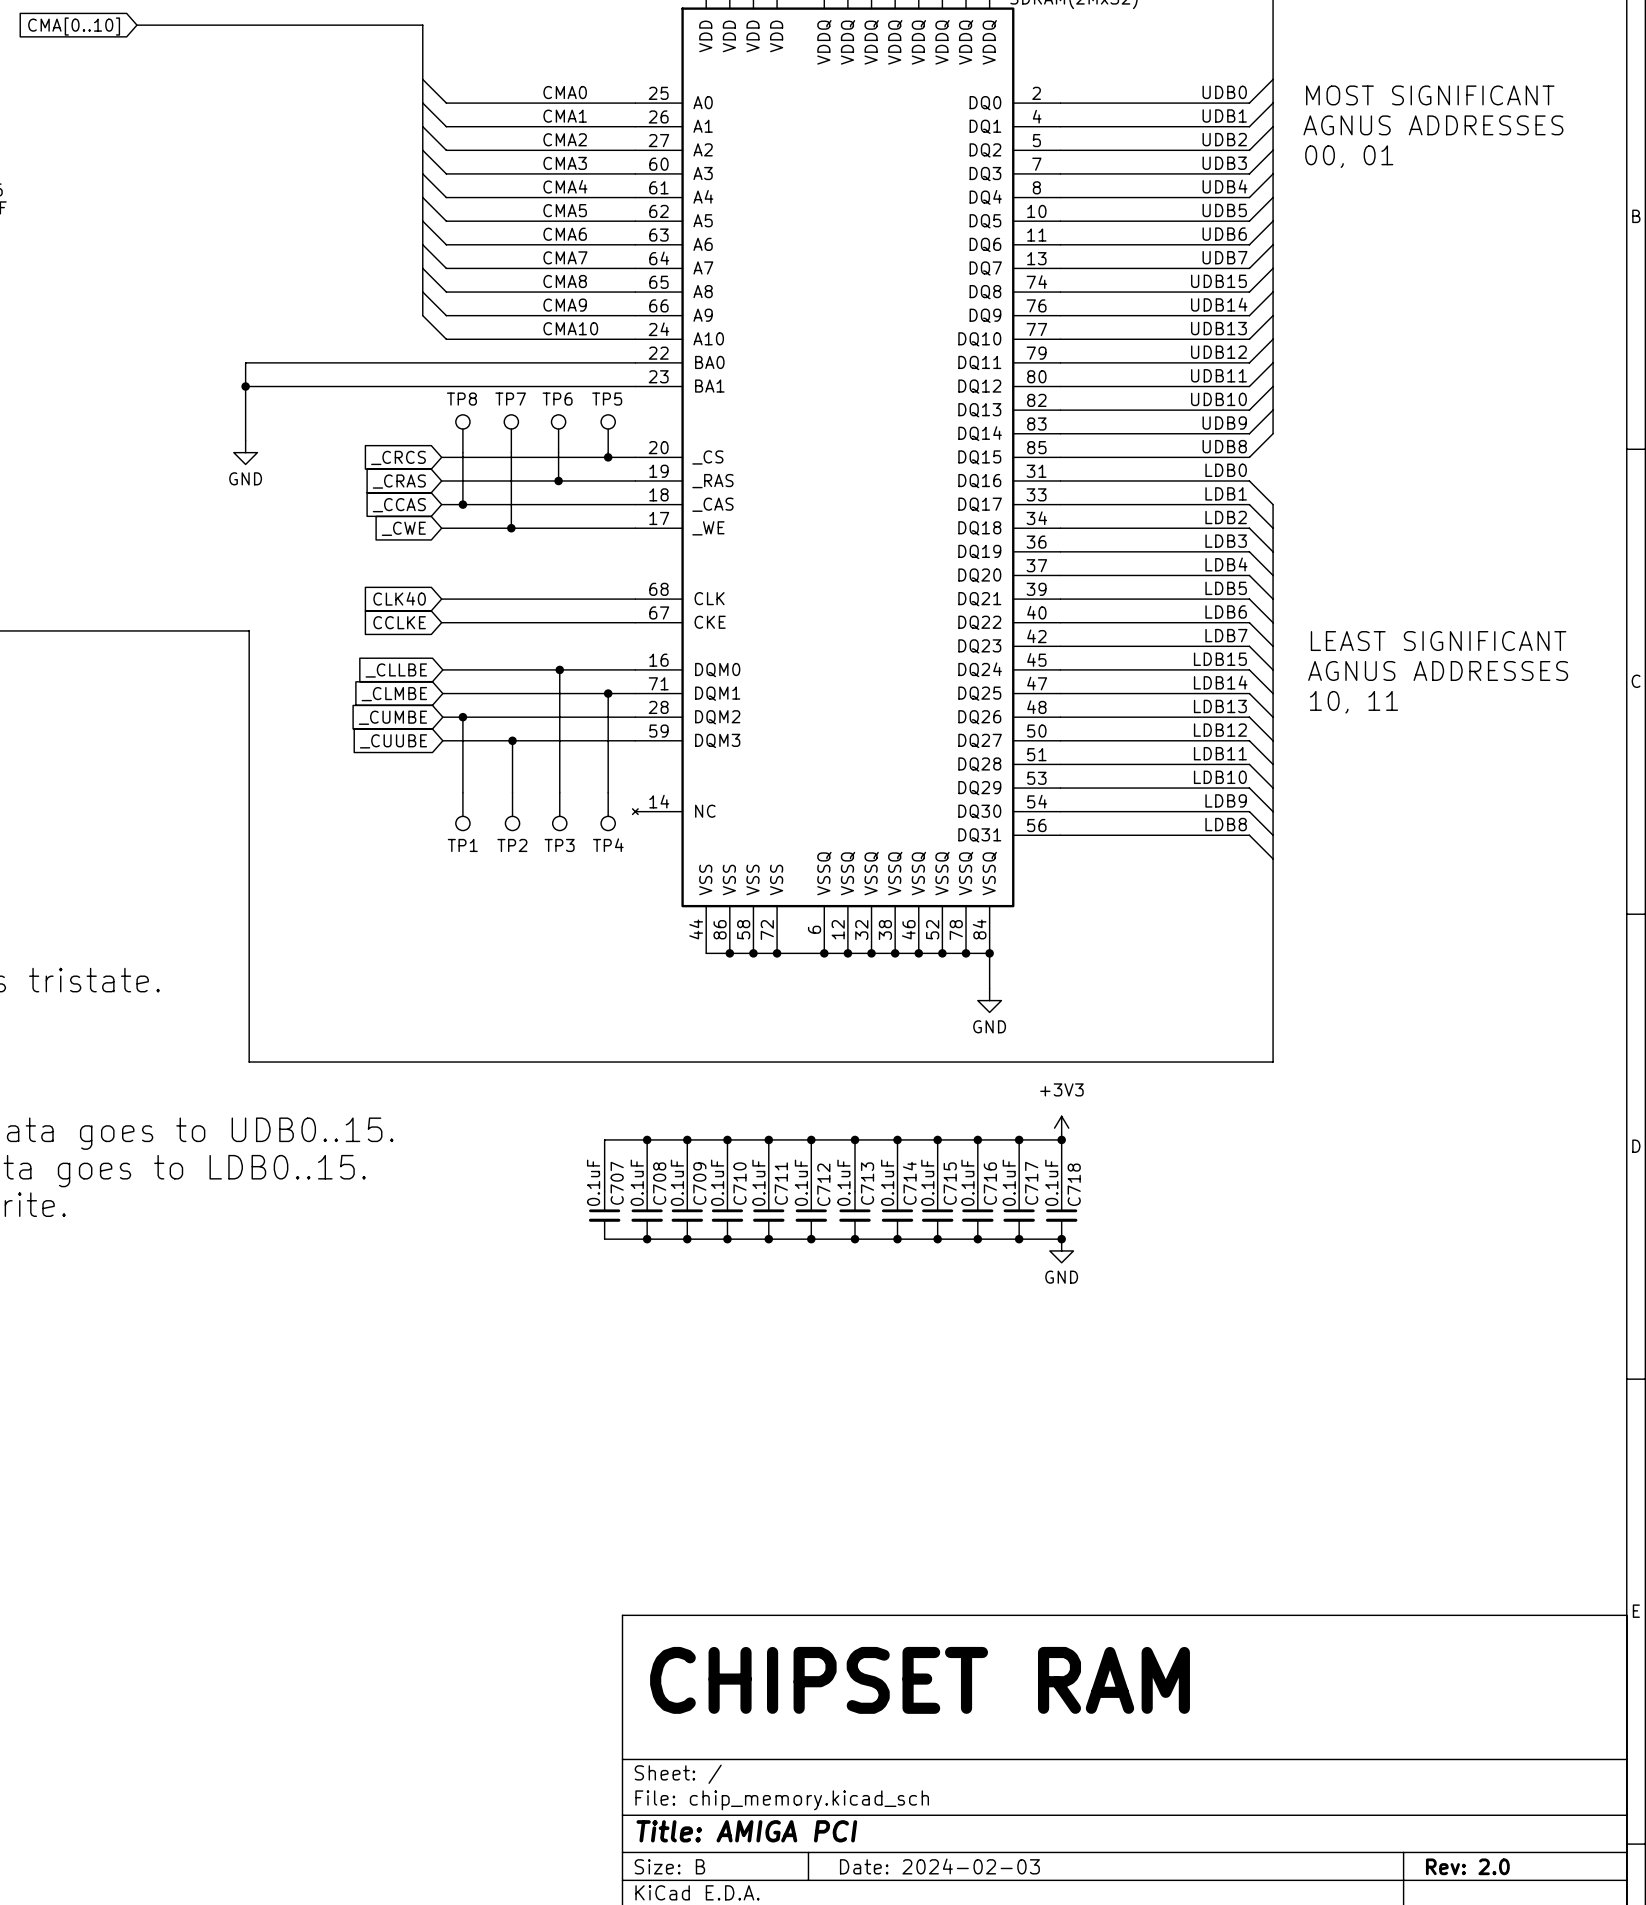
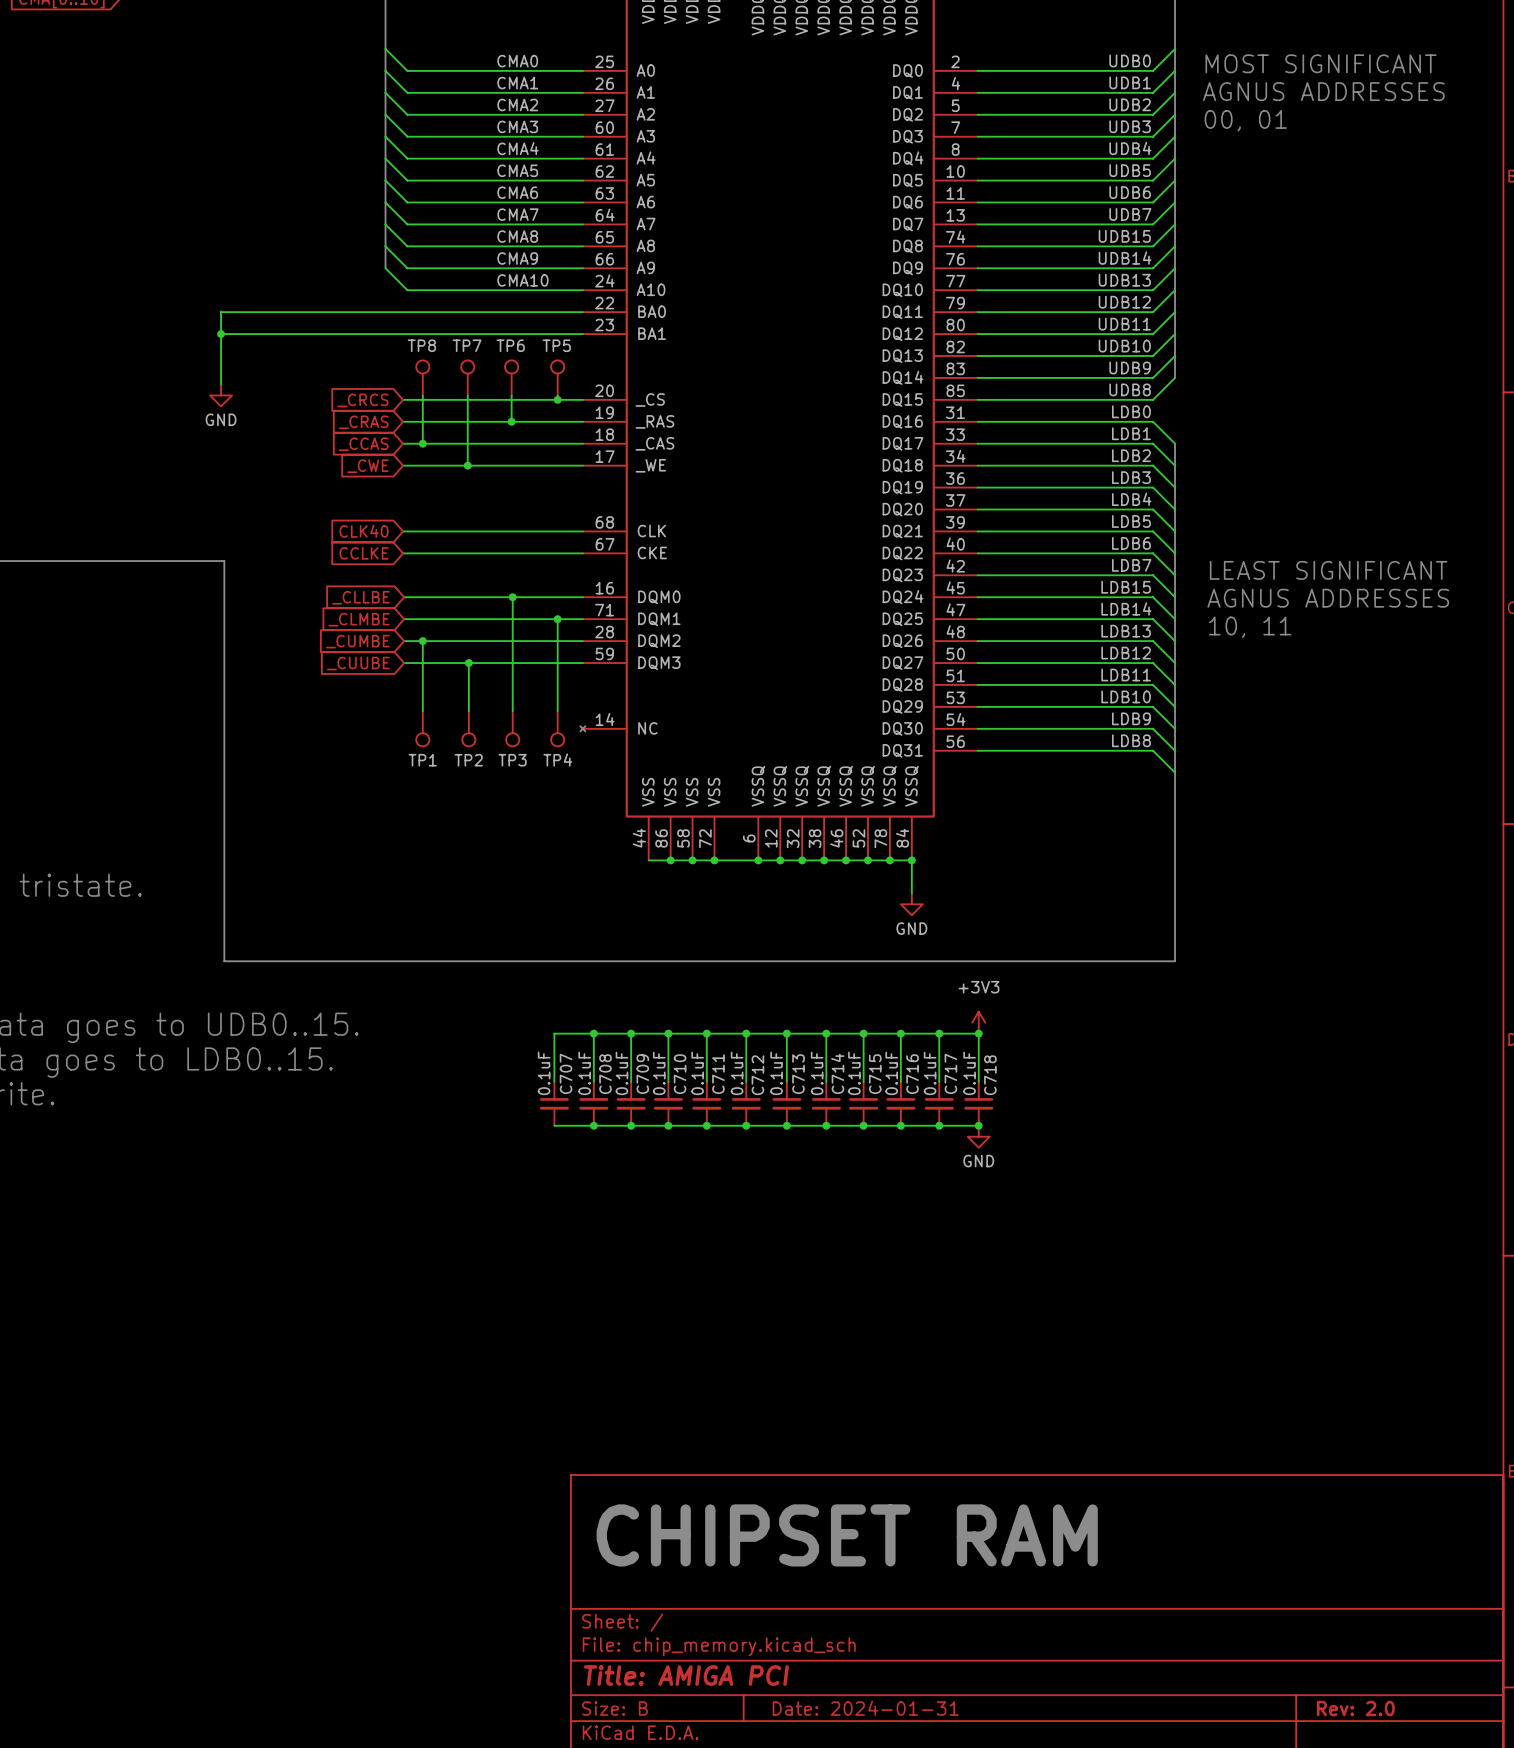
title block: Date: 2024-02-03 (939, 1866) -> Date: 2024-01-31 (865, 1708)

